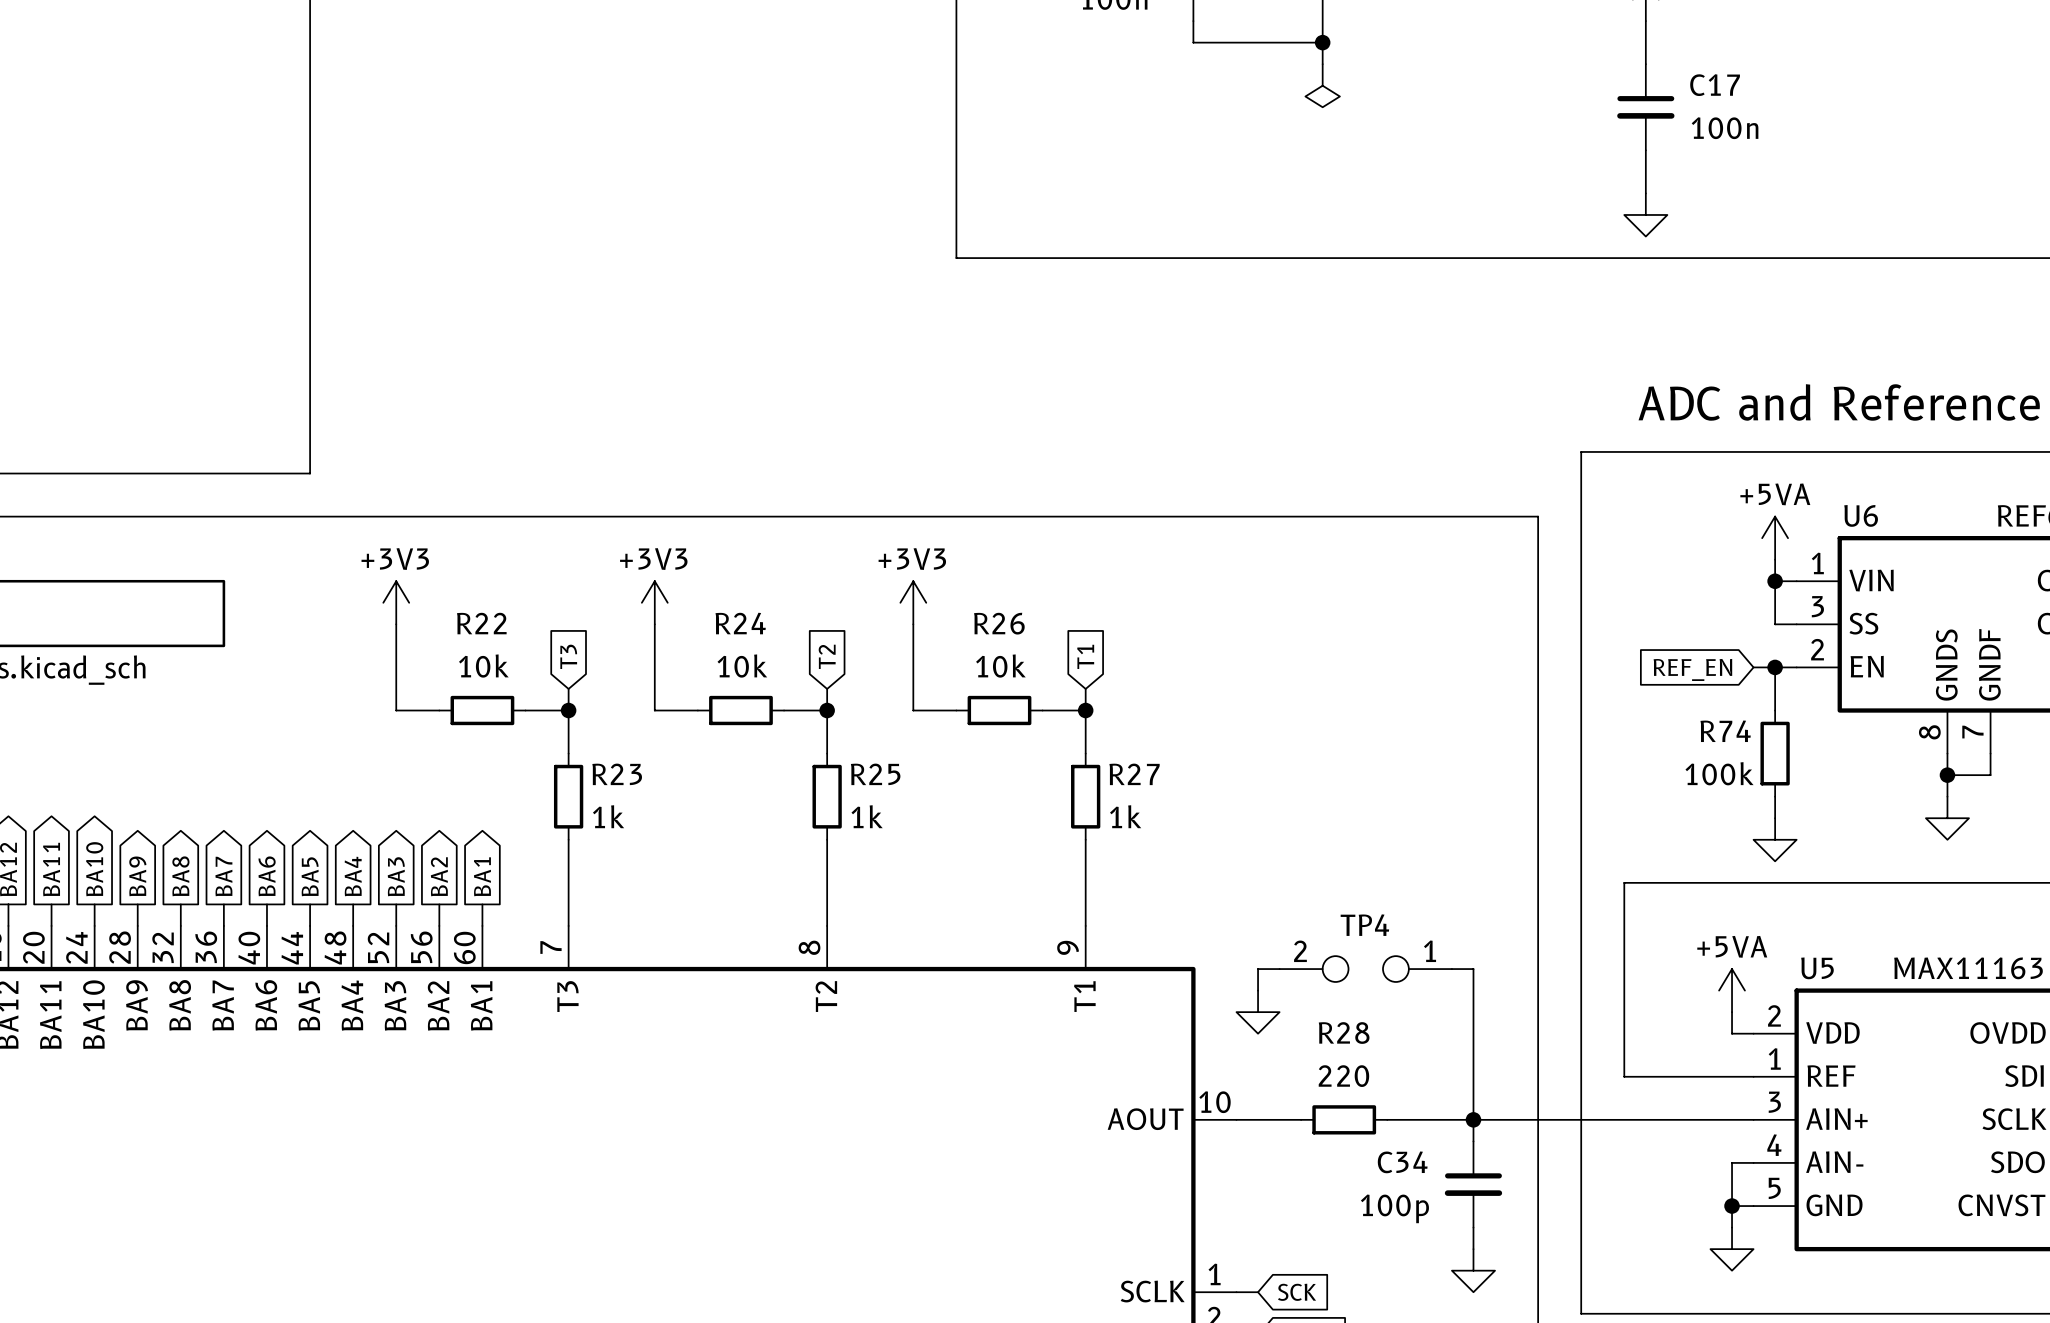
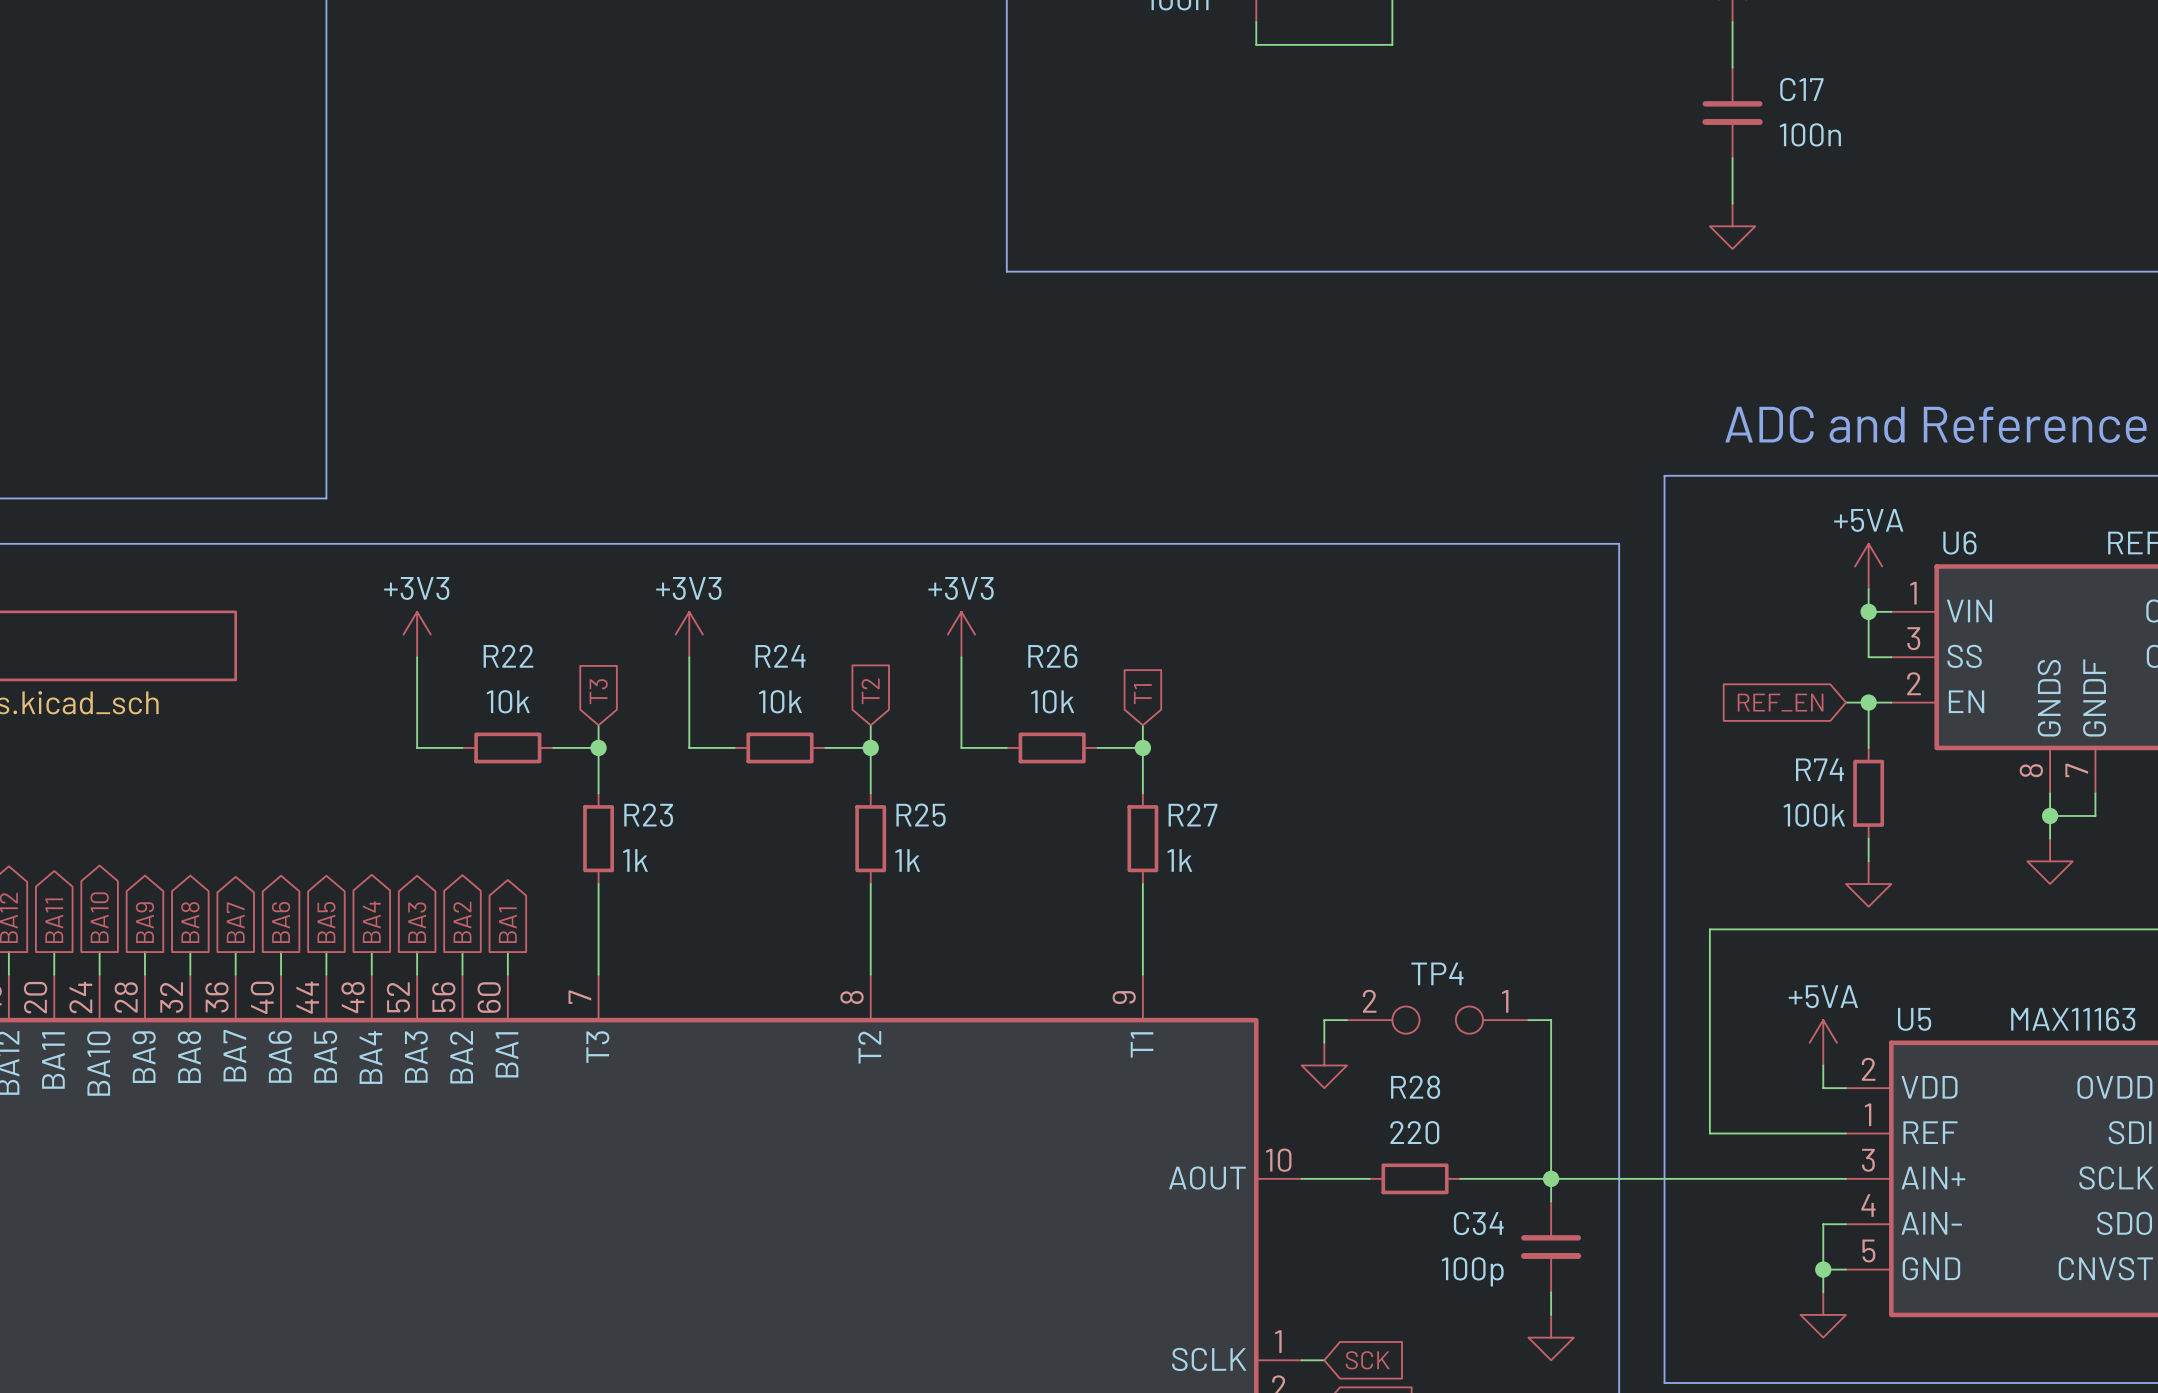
wire: (1322, 42) (1322, 64) -> none
junction: (1322, 42) -> none
power symbol: (1322, 85) -> none

